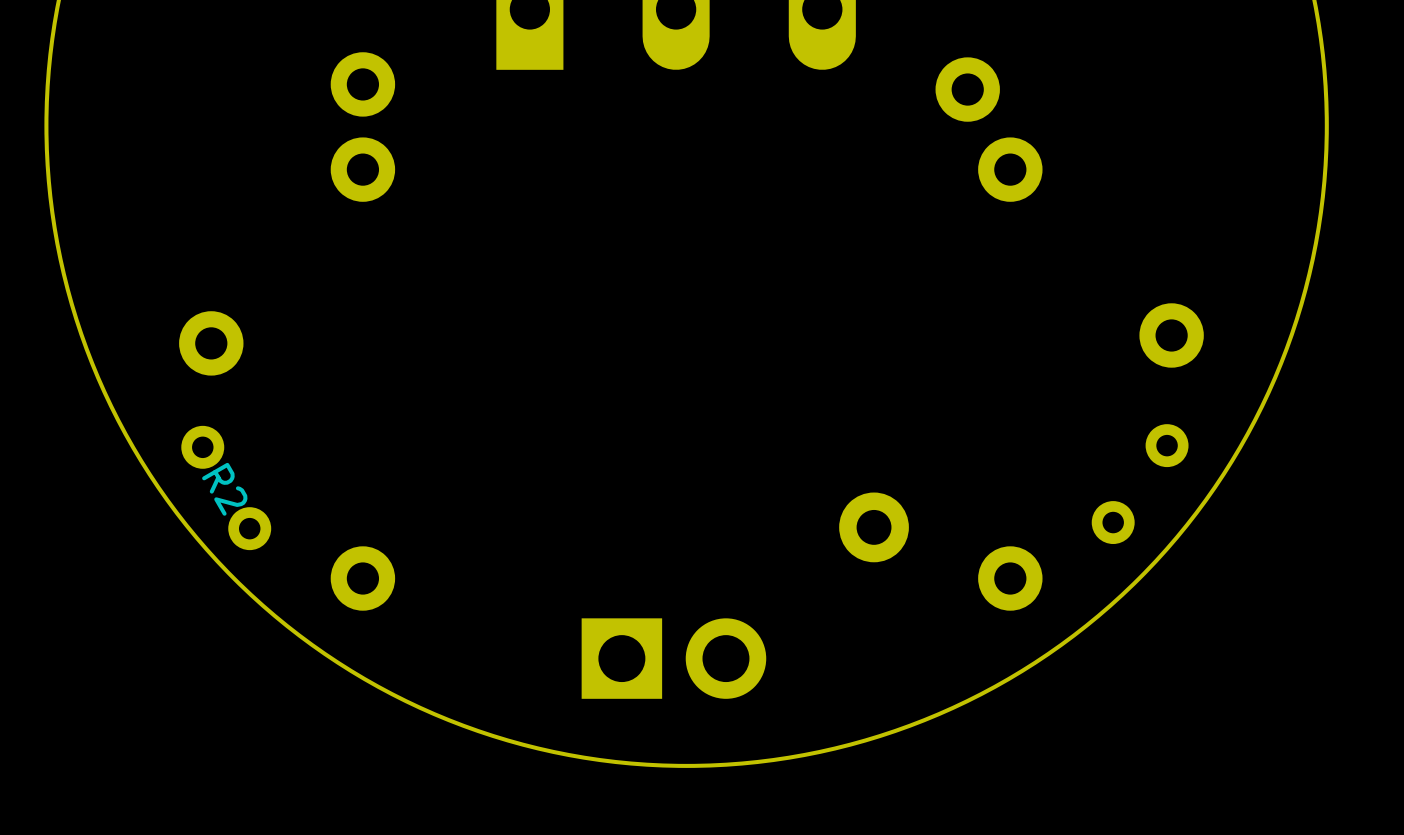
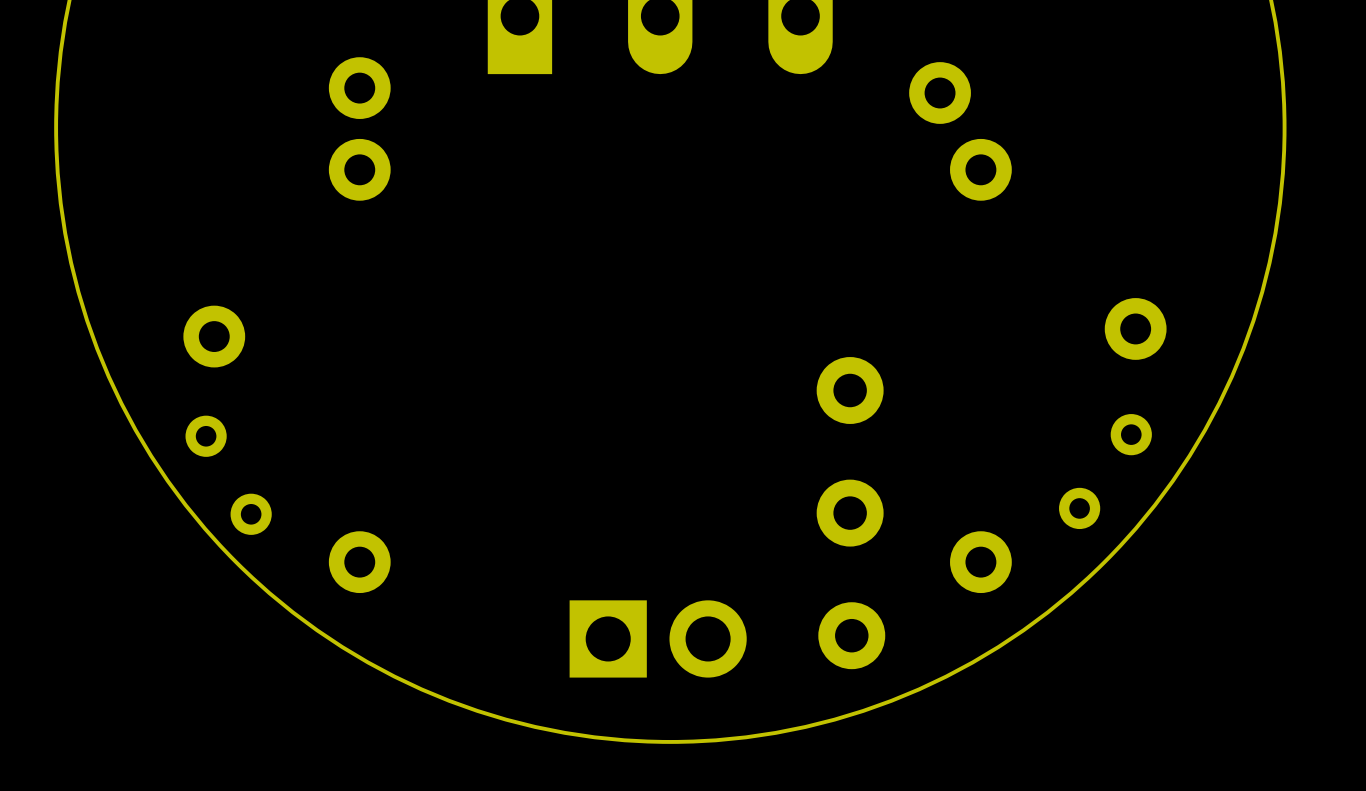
part: none -> (850, 390)
R2 name: R2 (224, 489) -> none
part: none -> (851, 635)

